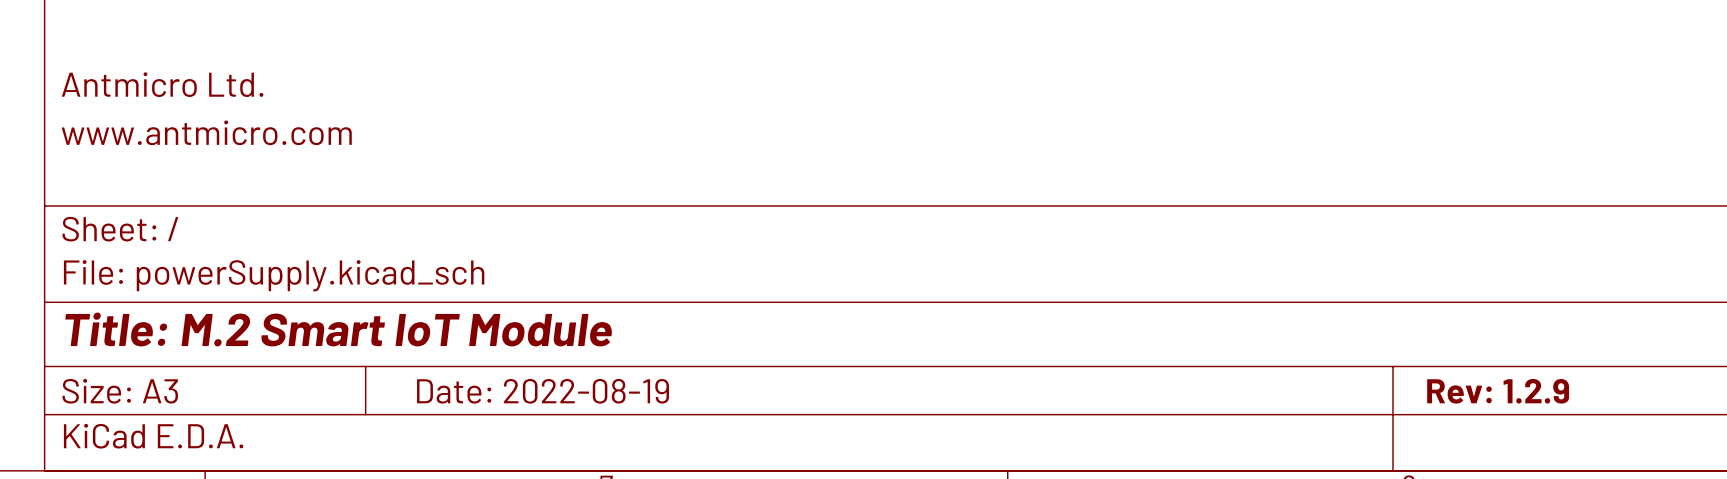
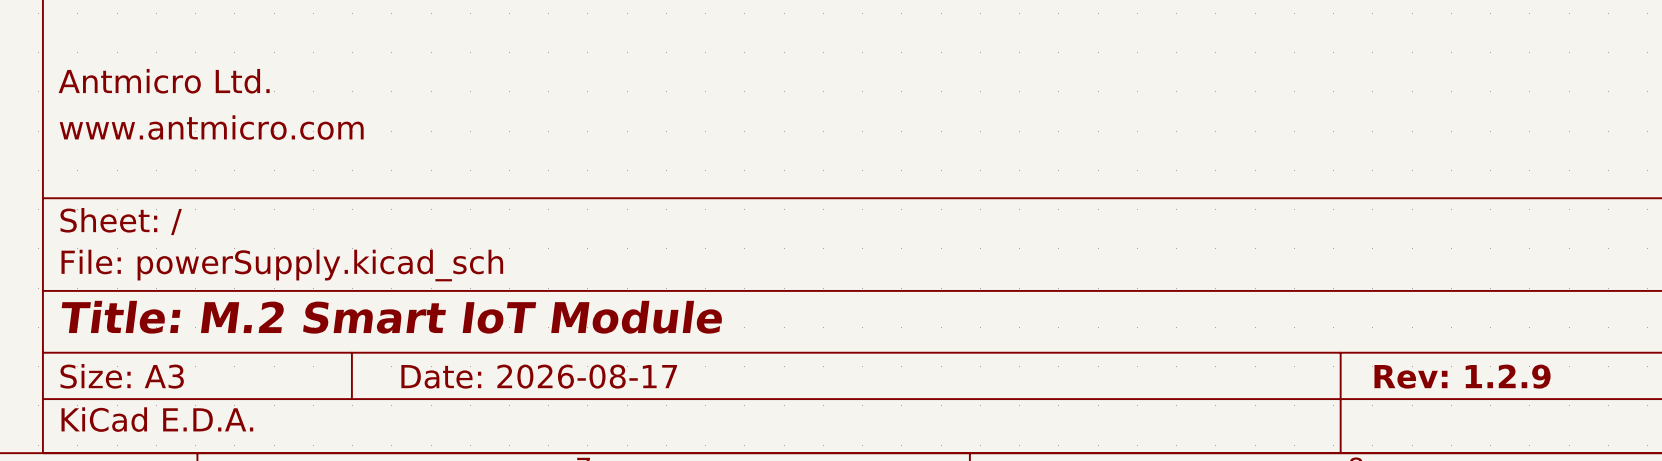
title block: Date: 2022-08-19 (543, 391) -> Date: 2026-08-17 (539, 376)

